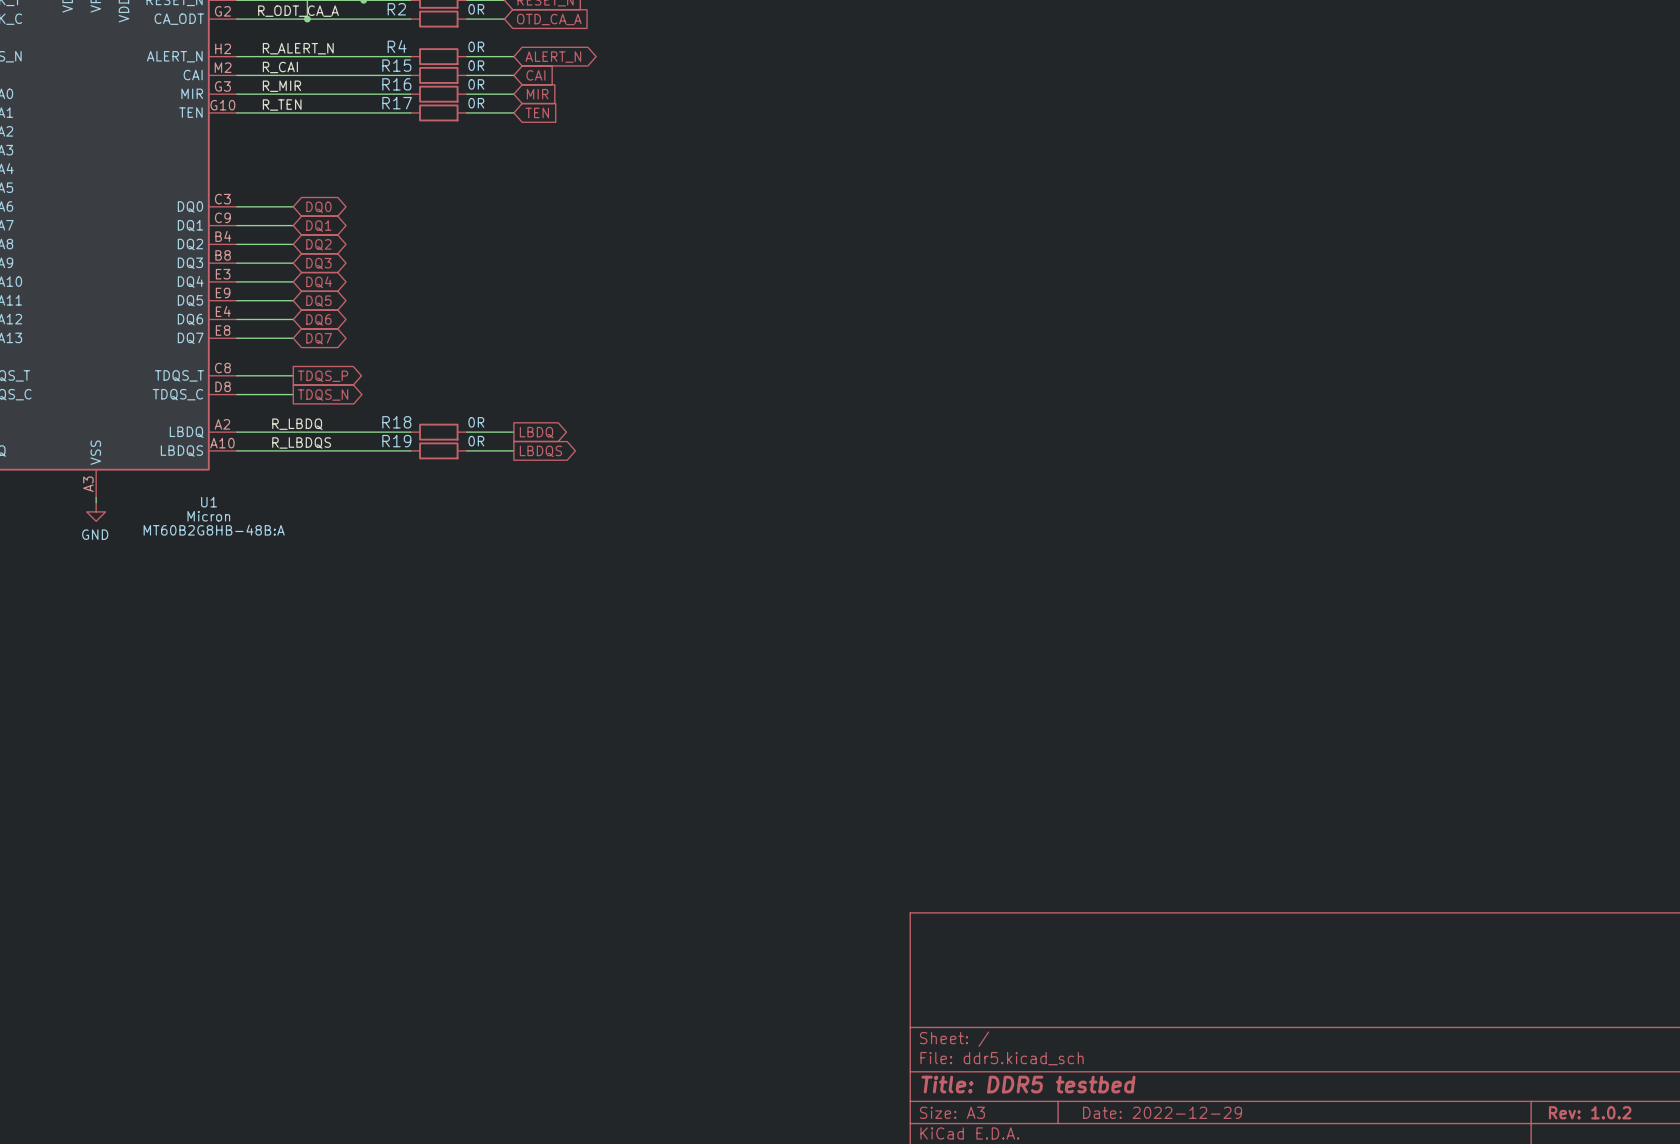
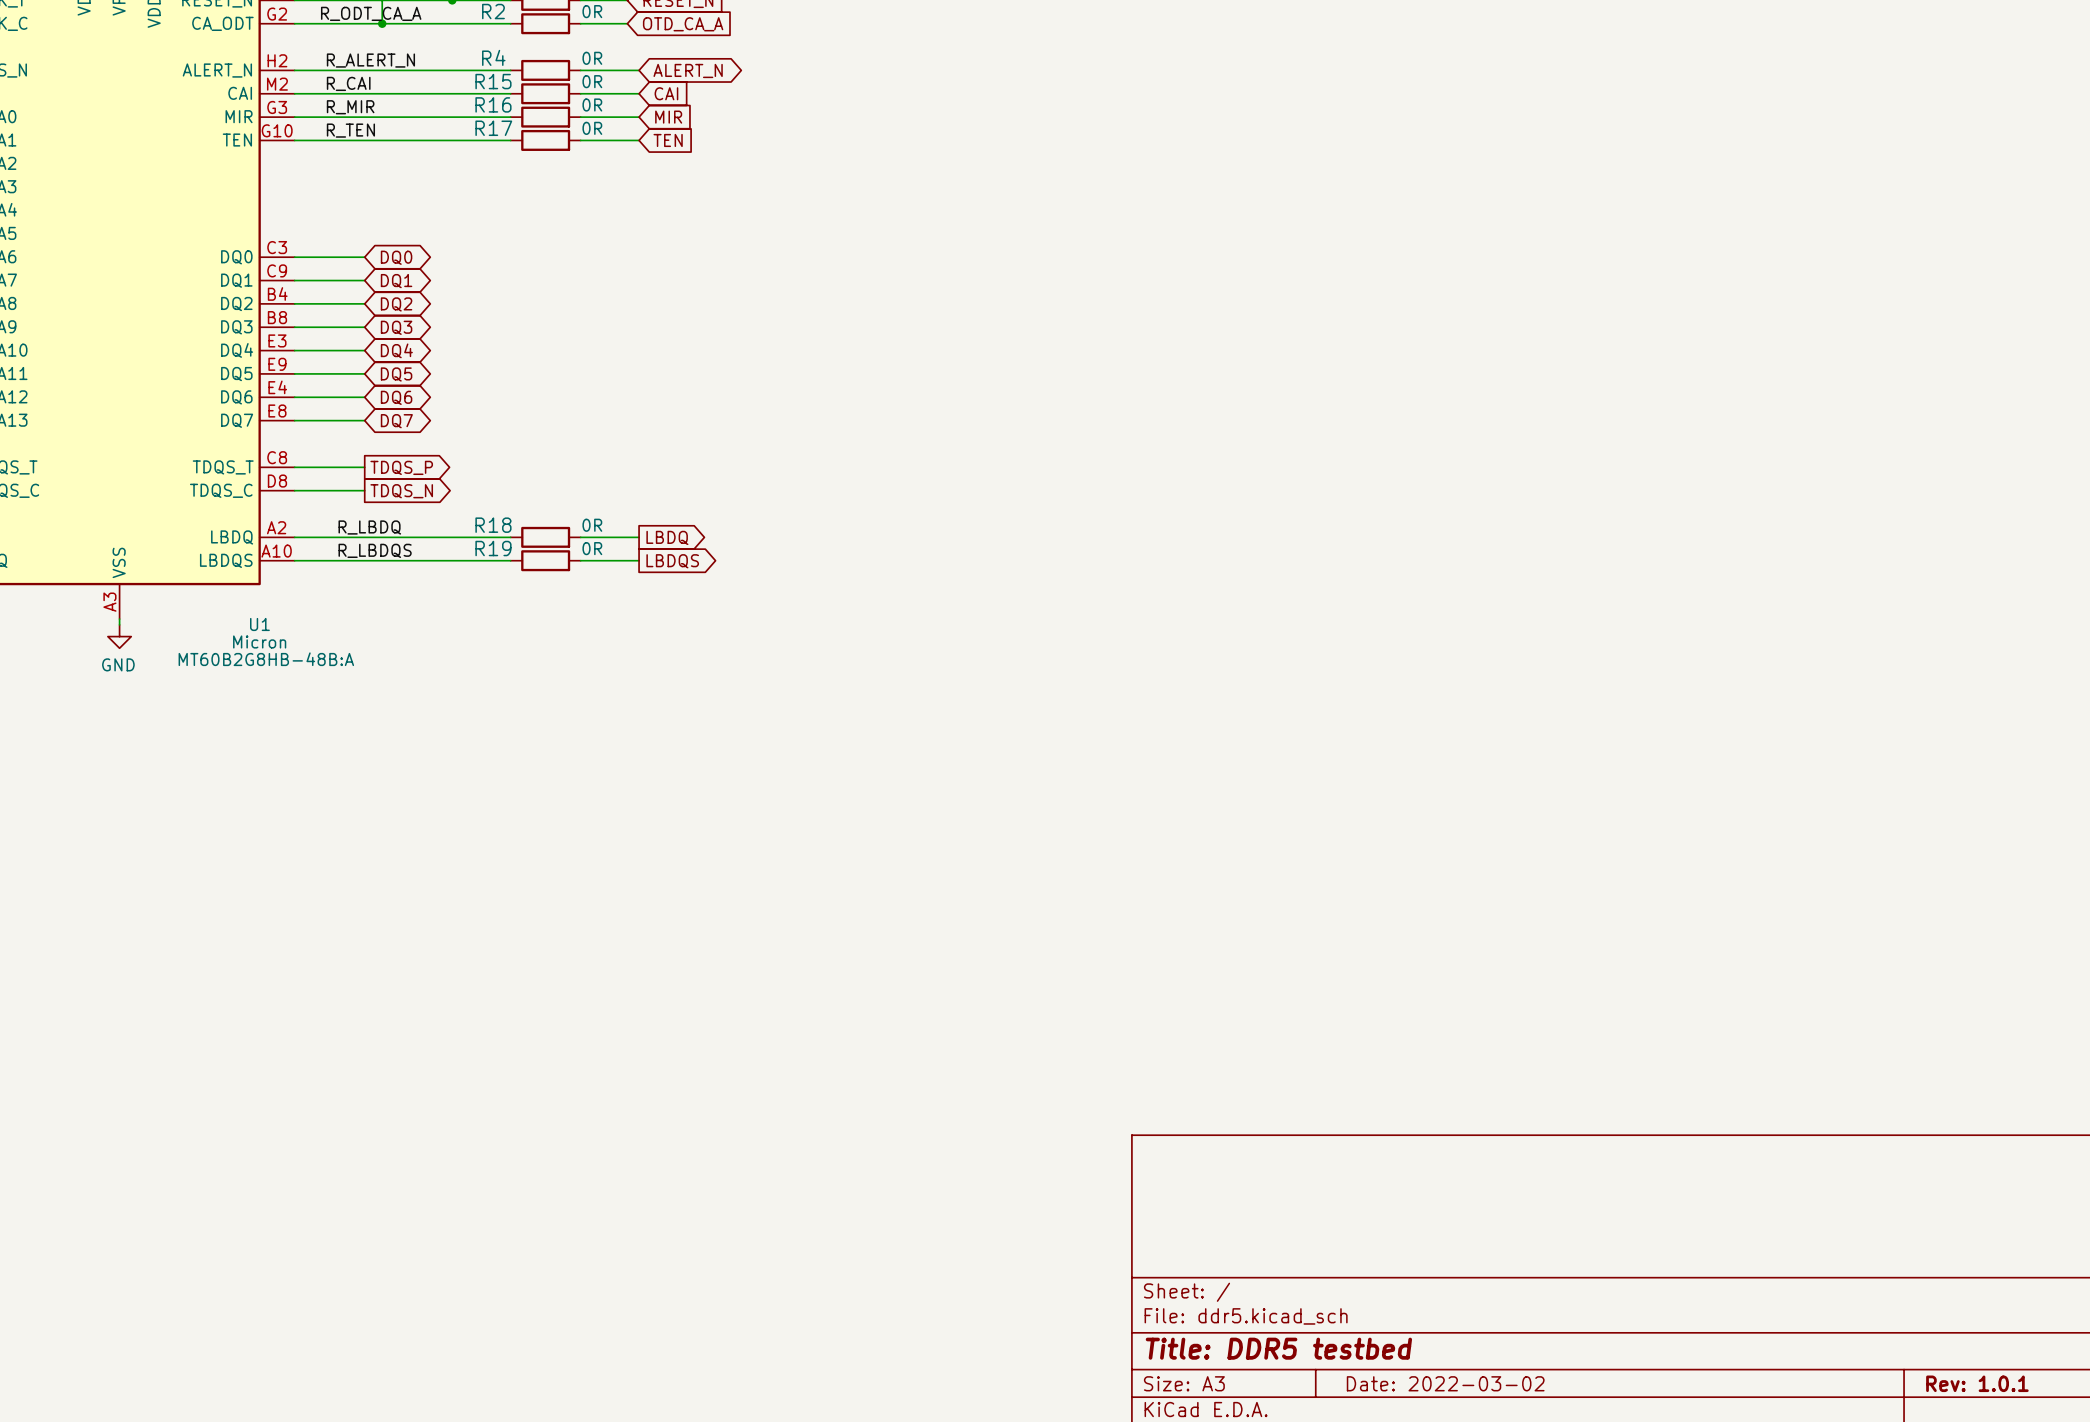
title block: Date: 2022-12-29 (1162, 1112) -> Date: 2022-03-02 (1445, 1383)
title block: Rev: 1.0.2 (1590, 1112) -> Rev: 1.0.1 (1977, 1383)

